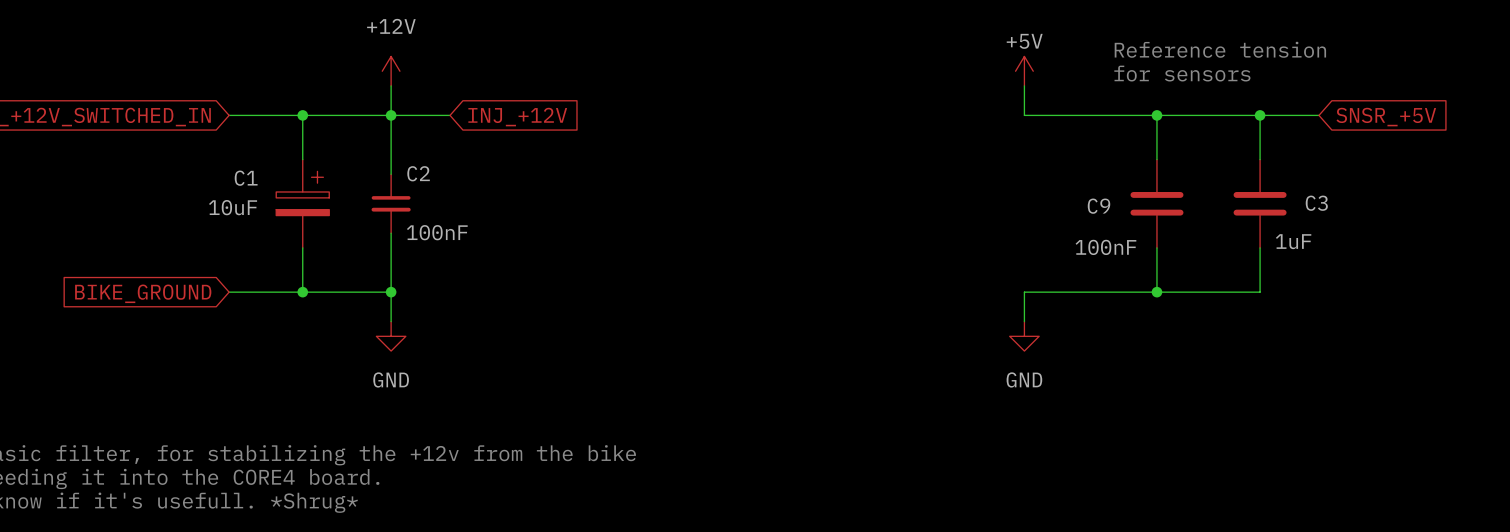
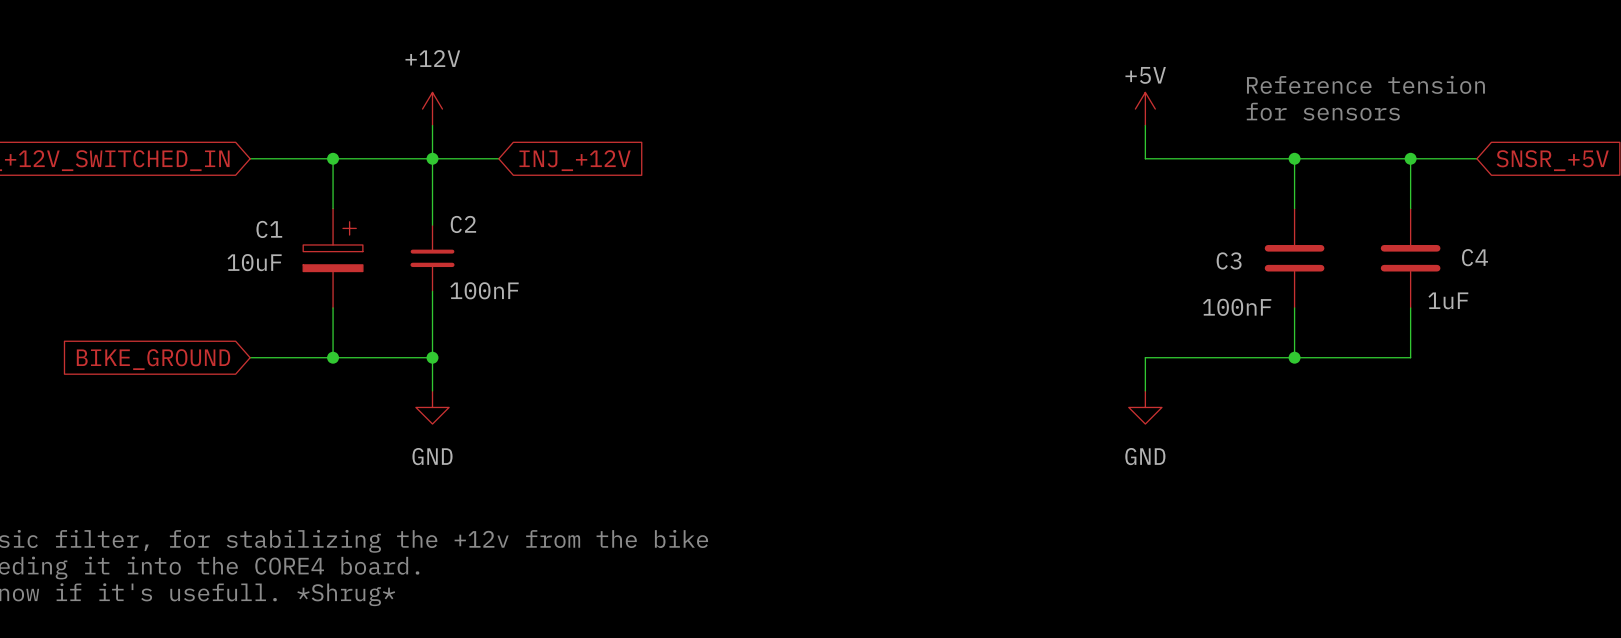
C3 name: C3 (1316, 203) -> C4 (1474, 257)
C9 name: C9 (1099, 206) -> C3 (1229, 260)

